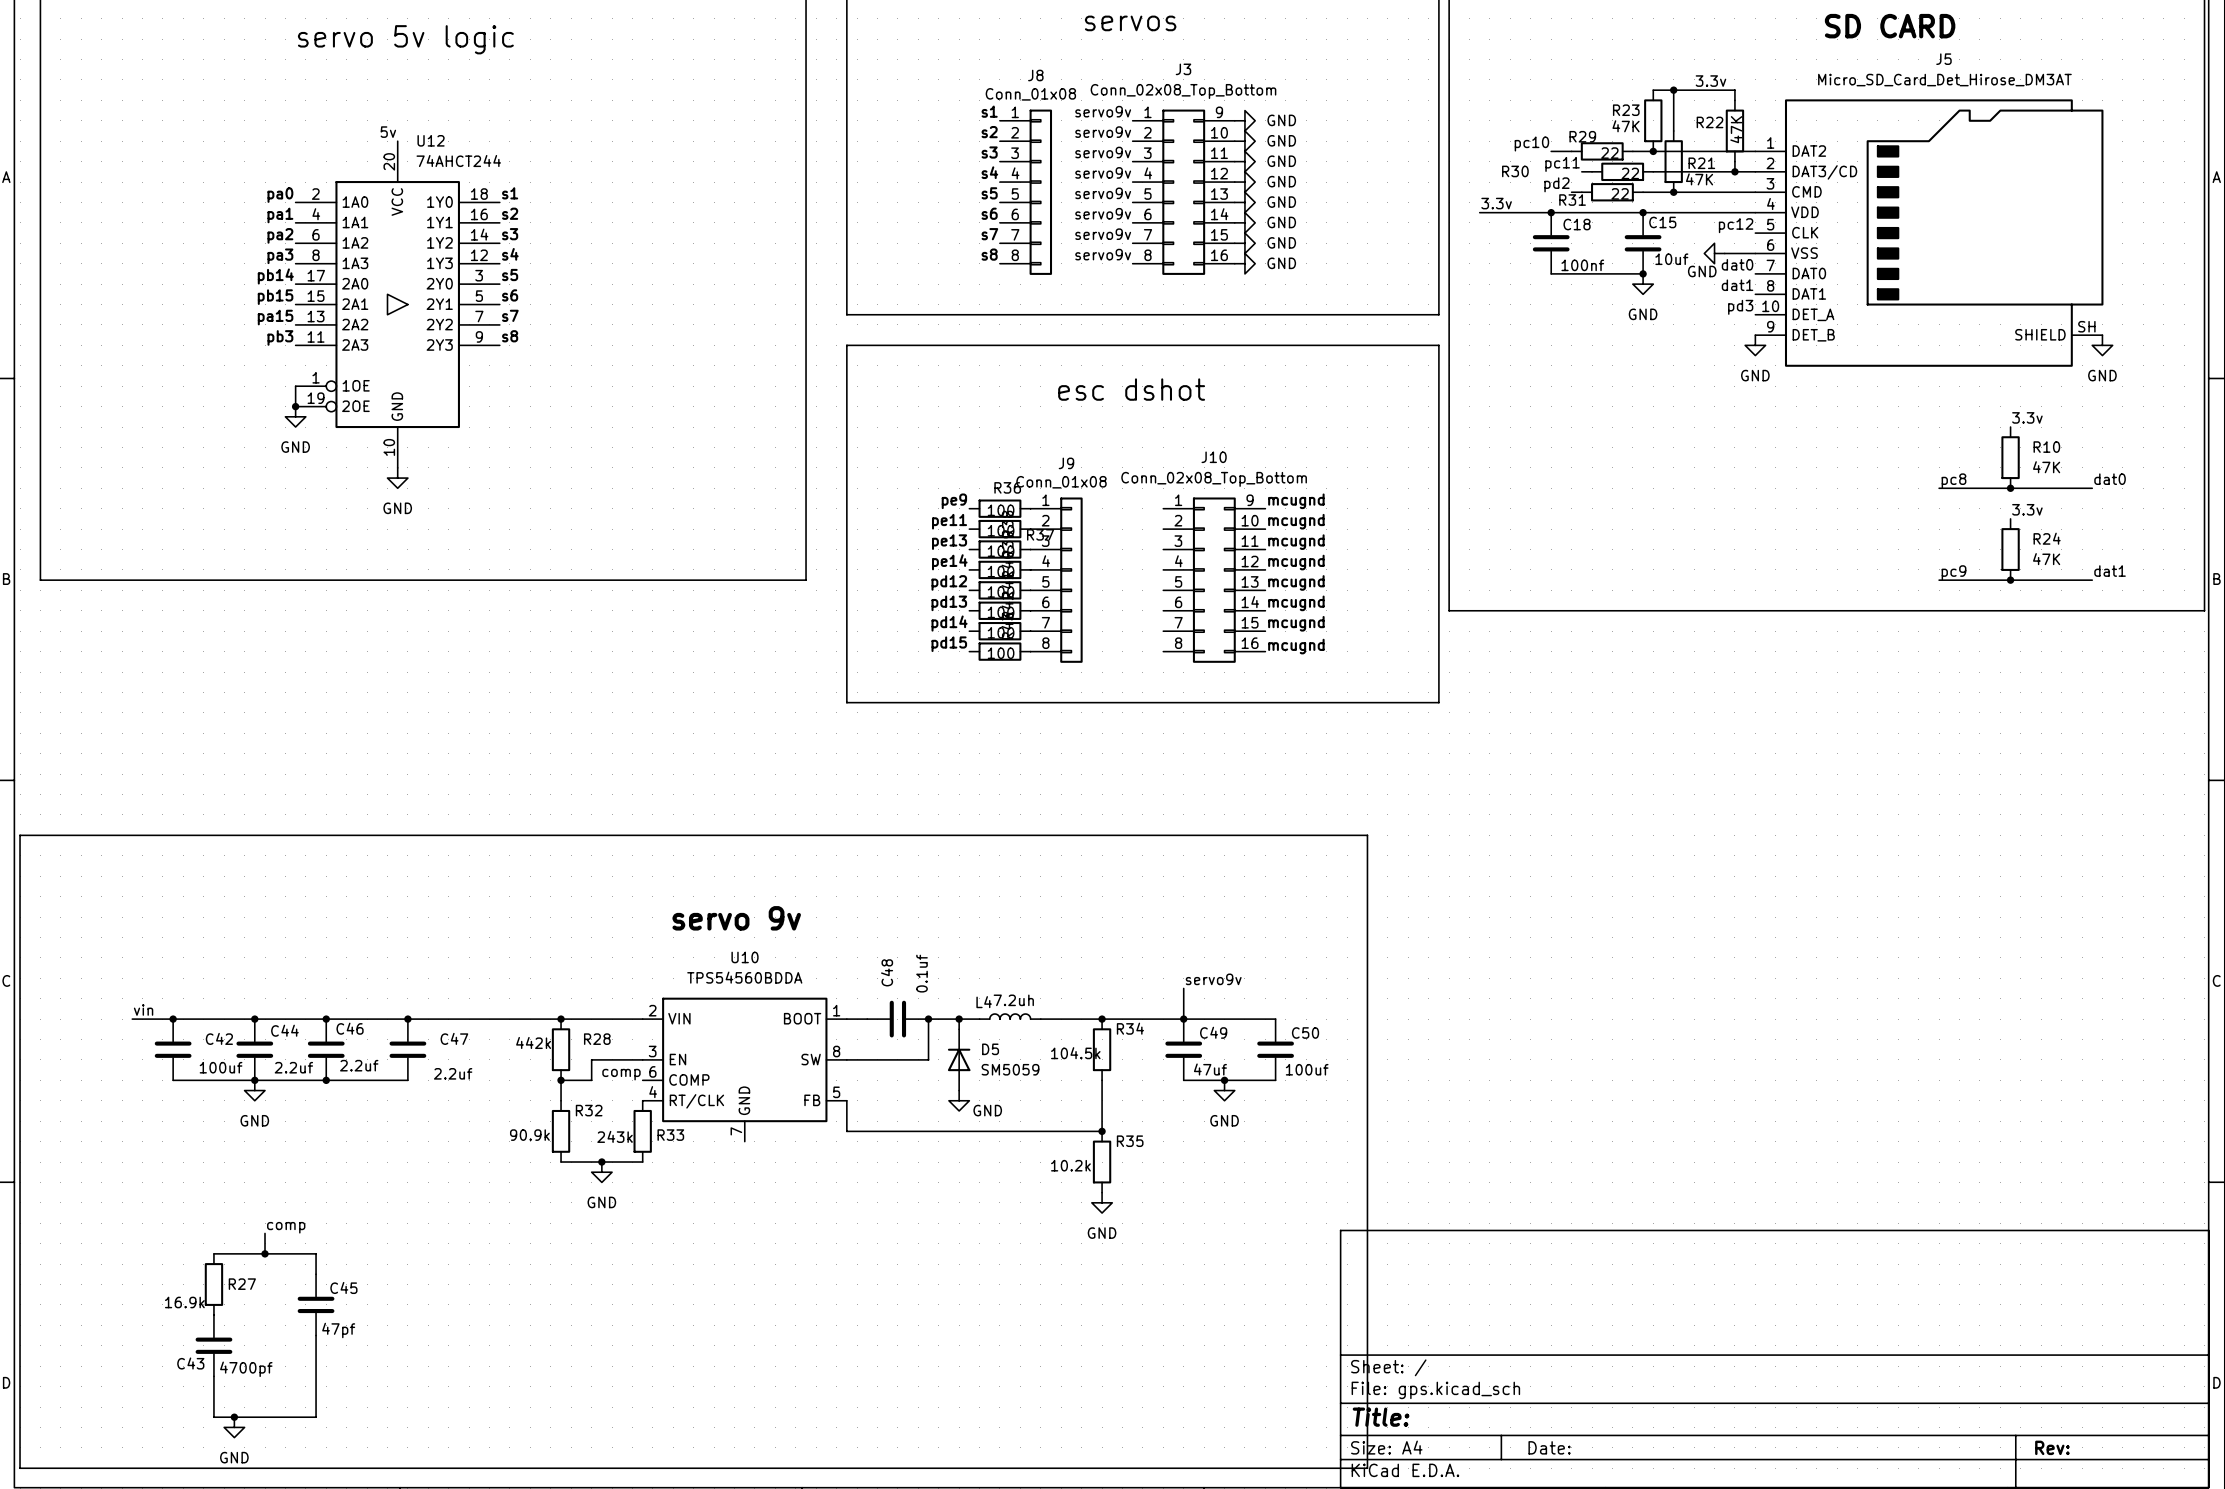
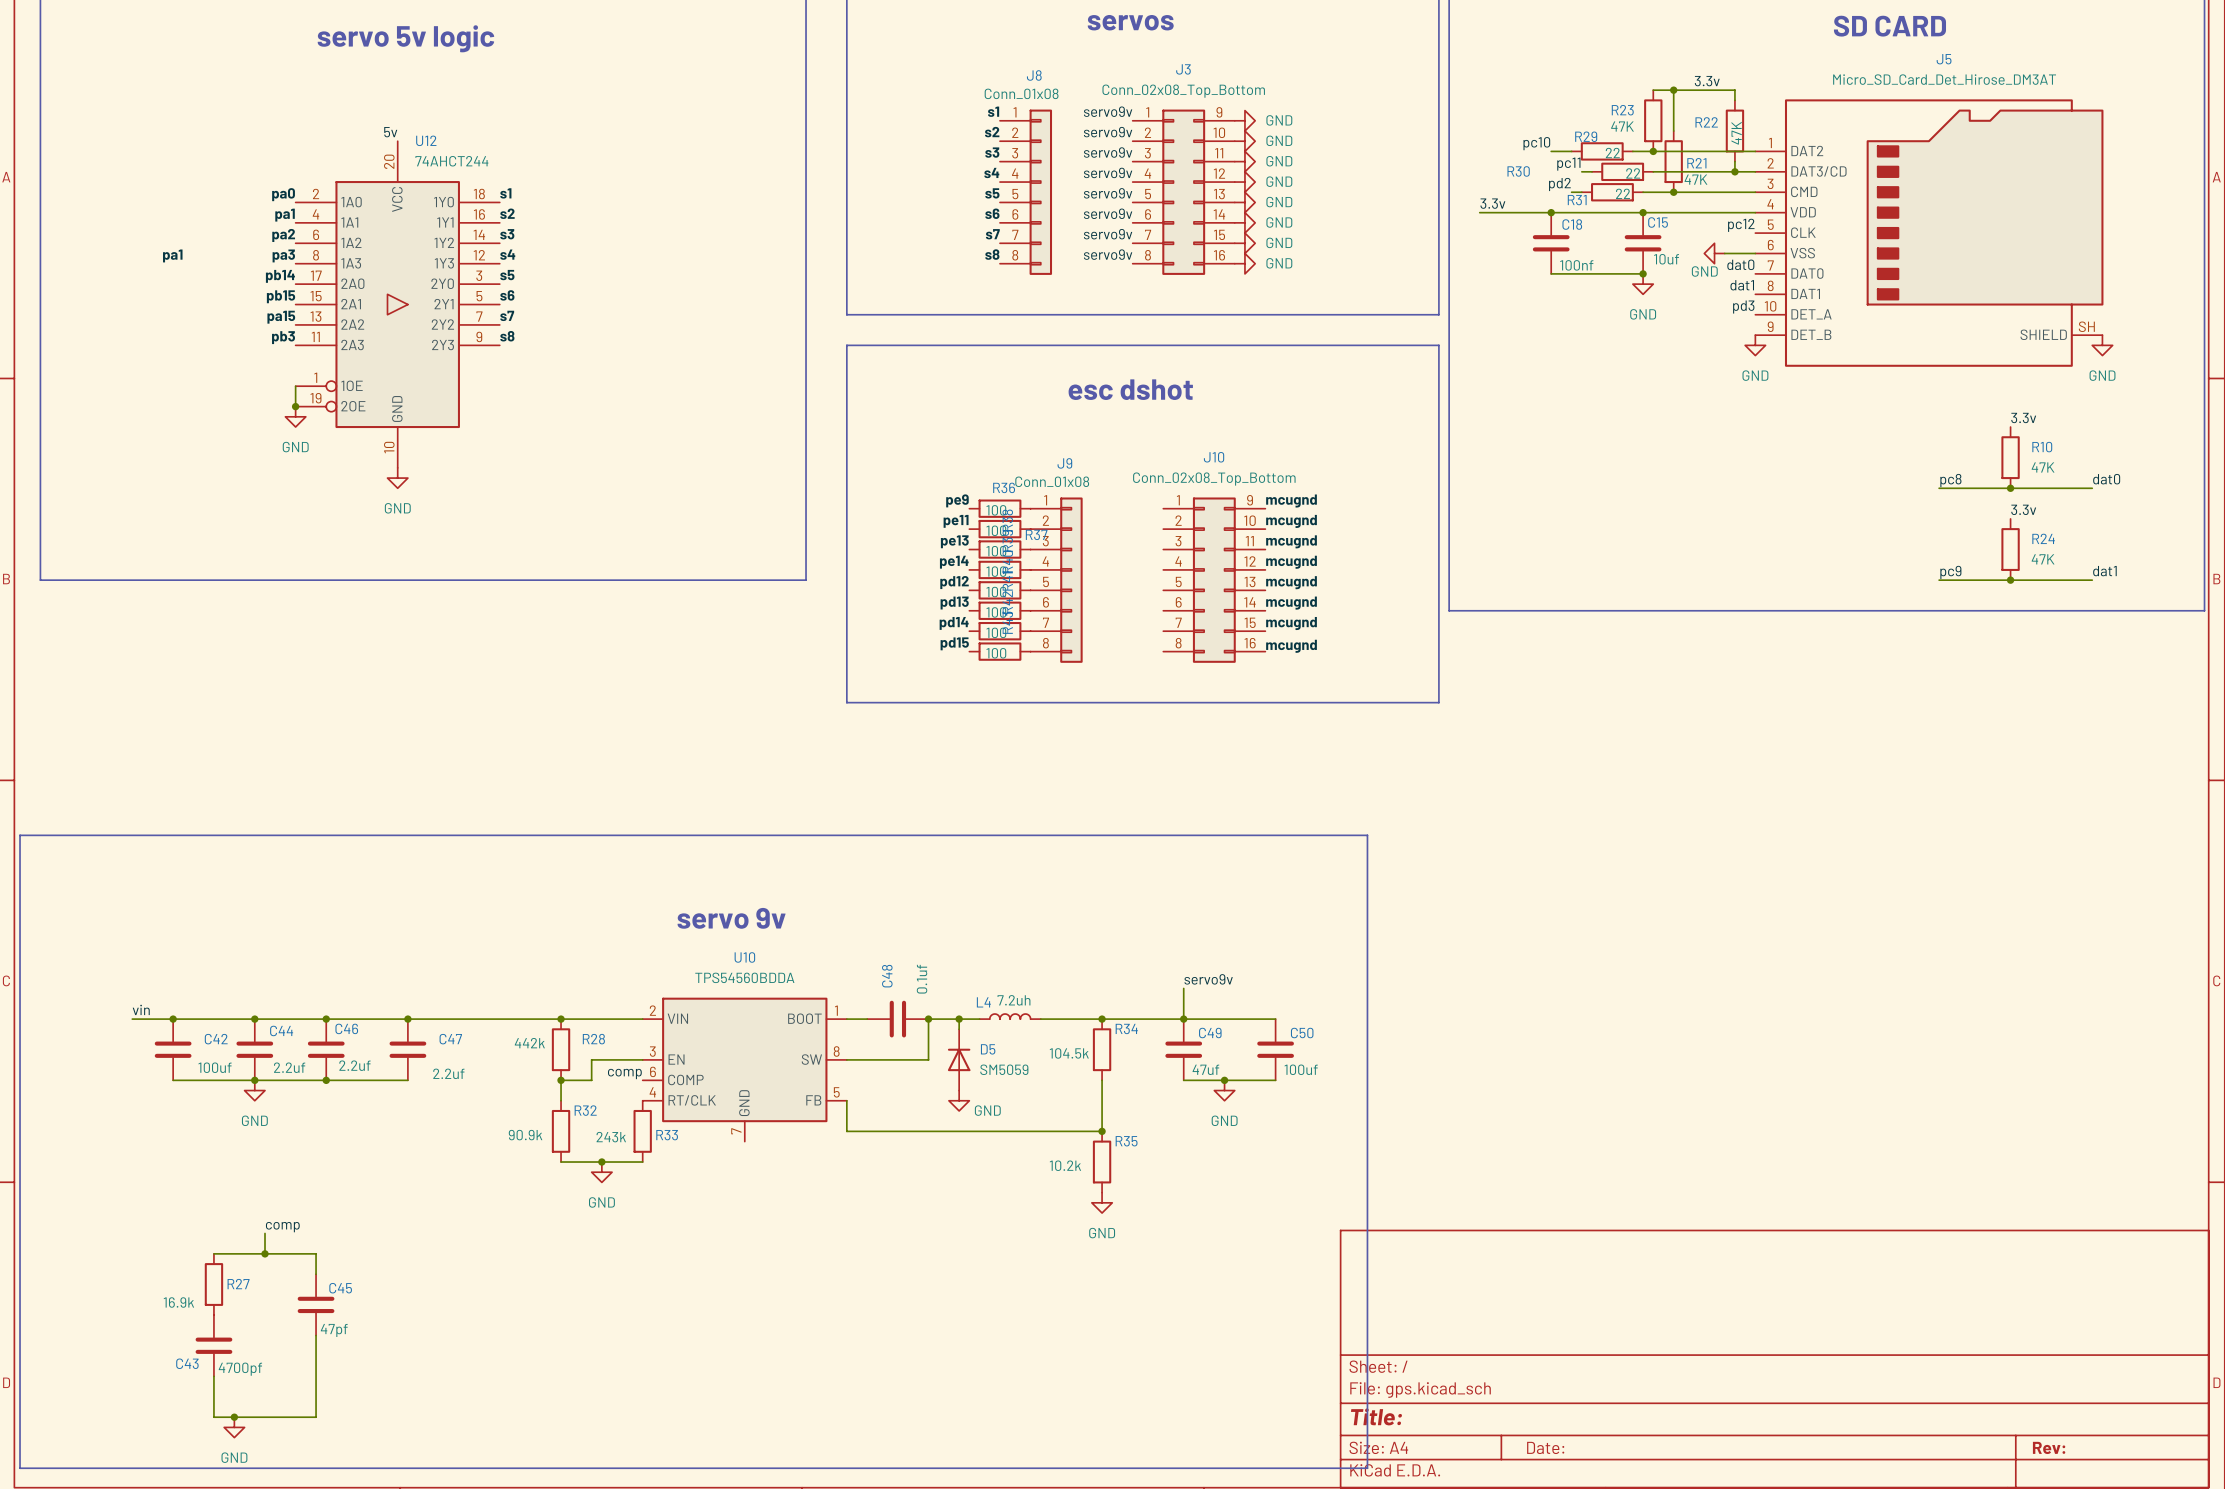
label: none -> pa1 (172, 255)

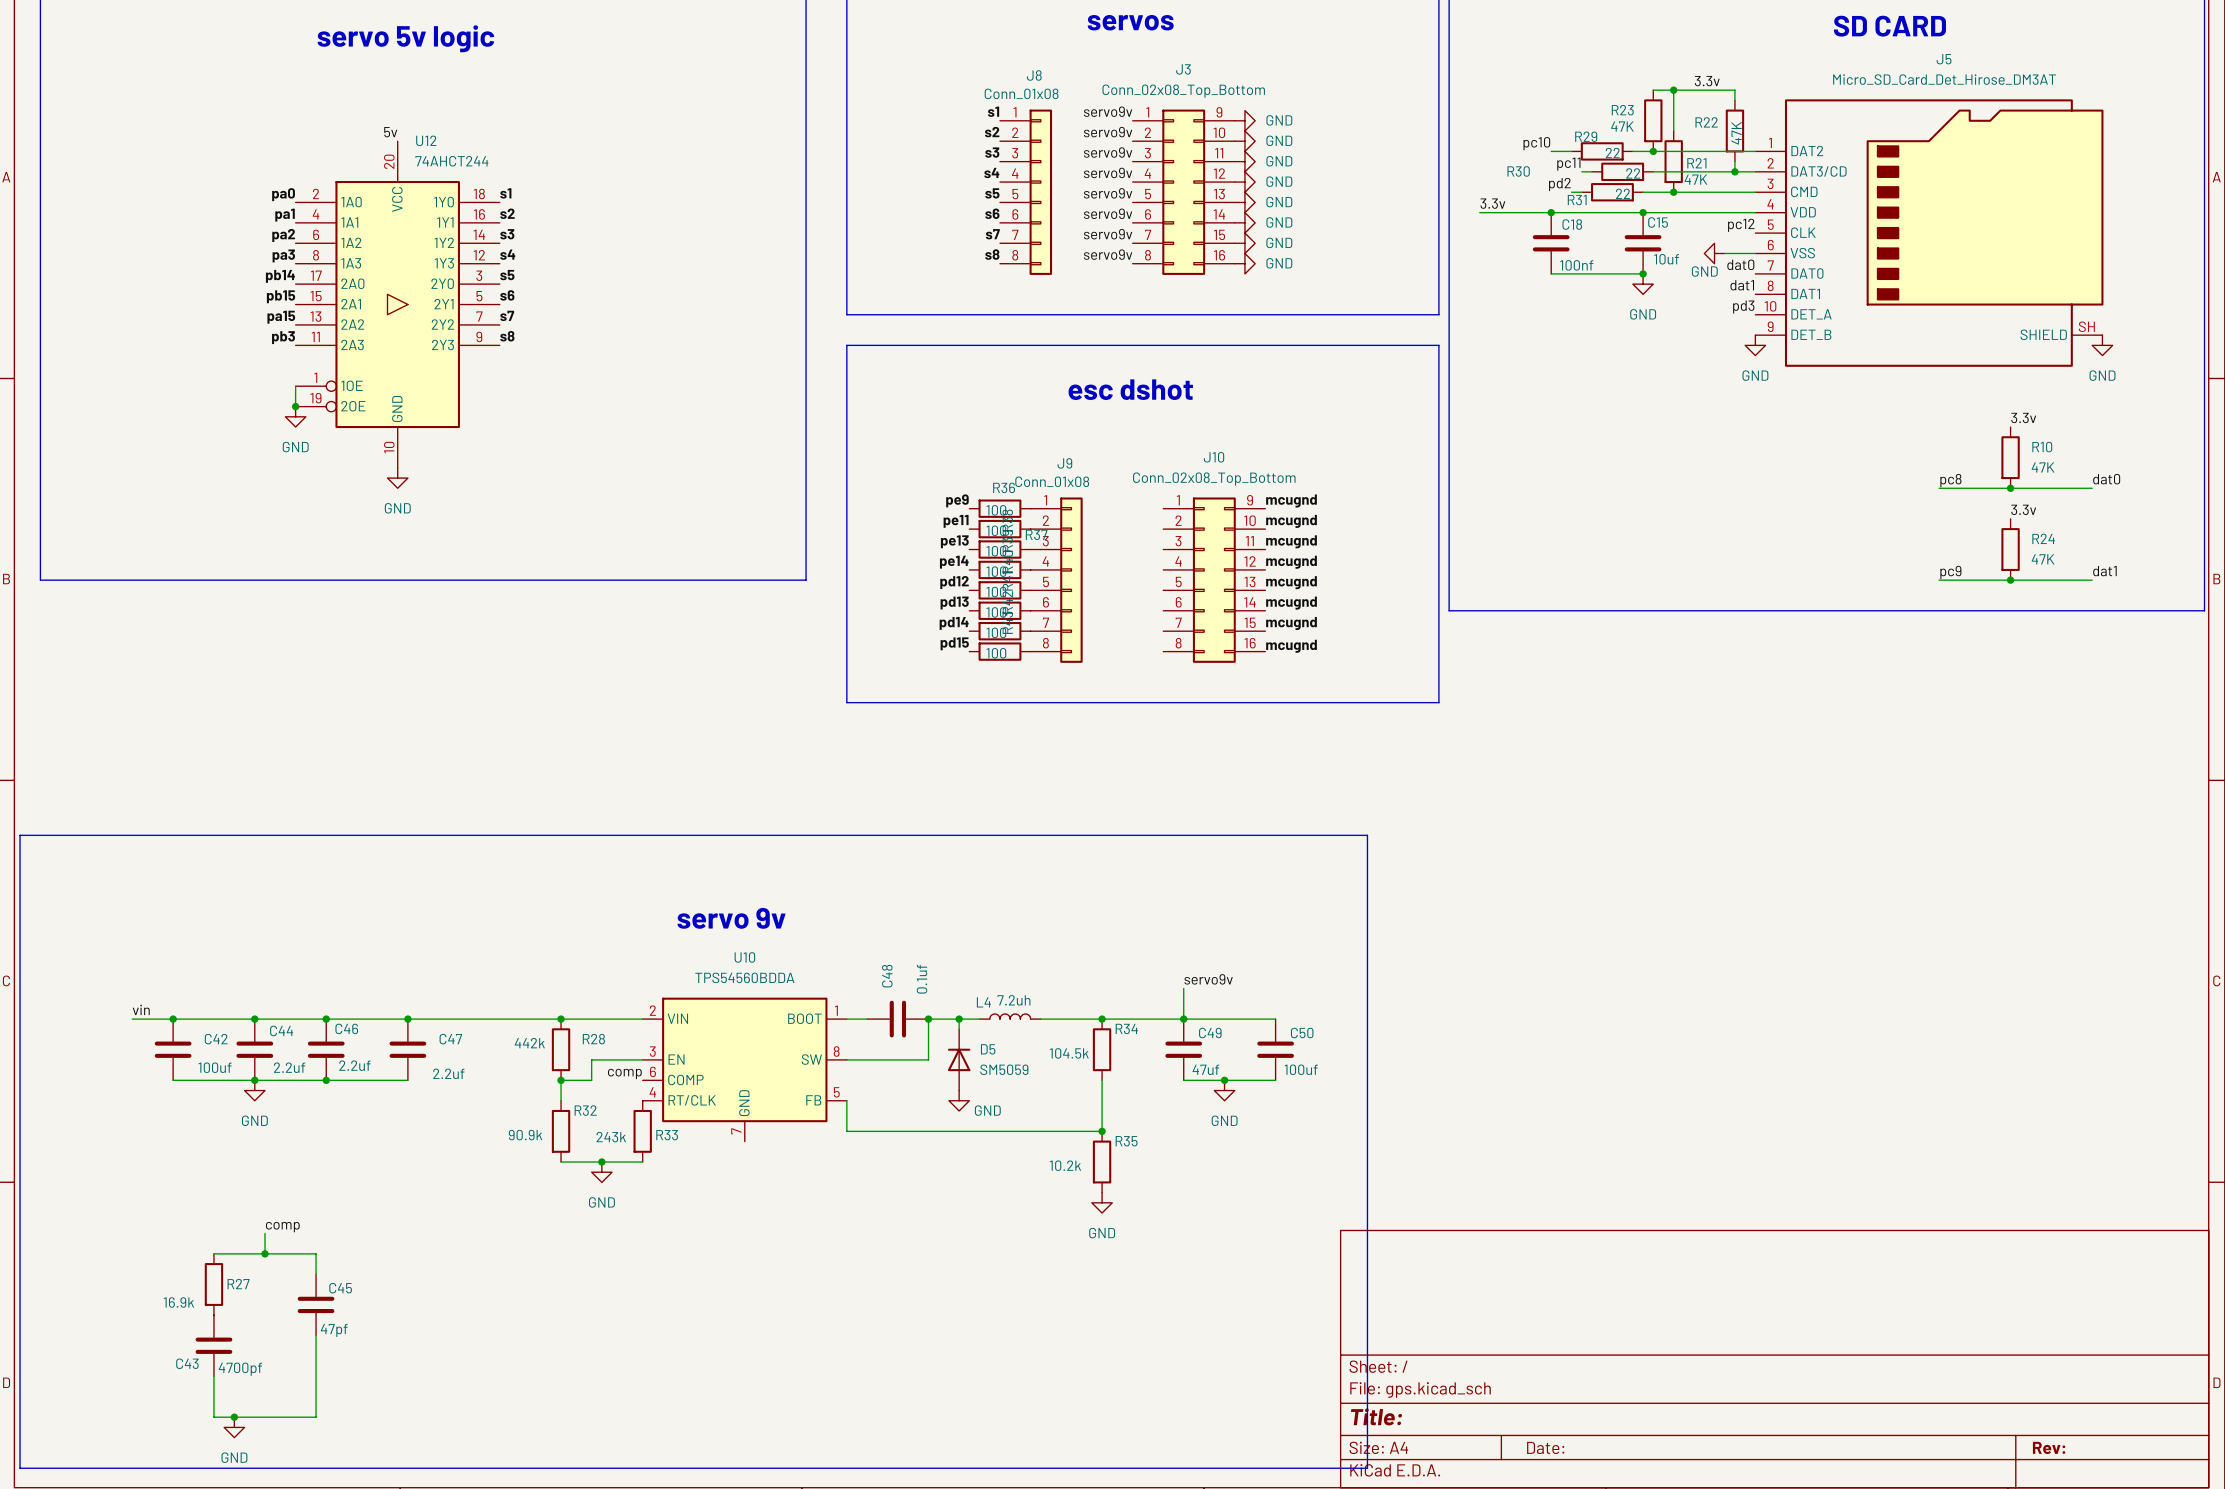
label: pa1 (172, 255) -> none

